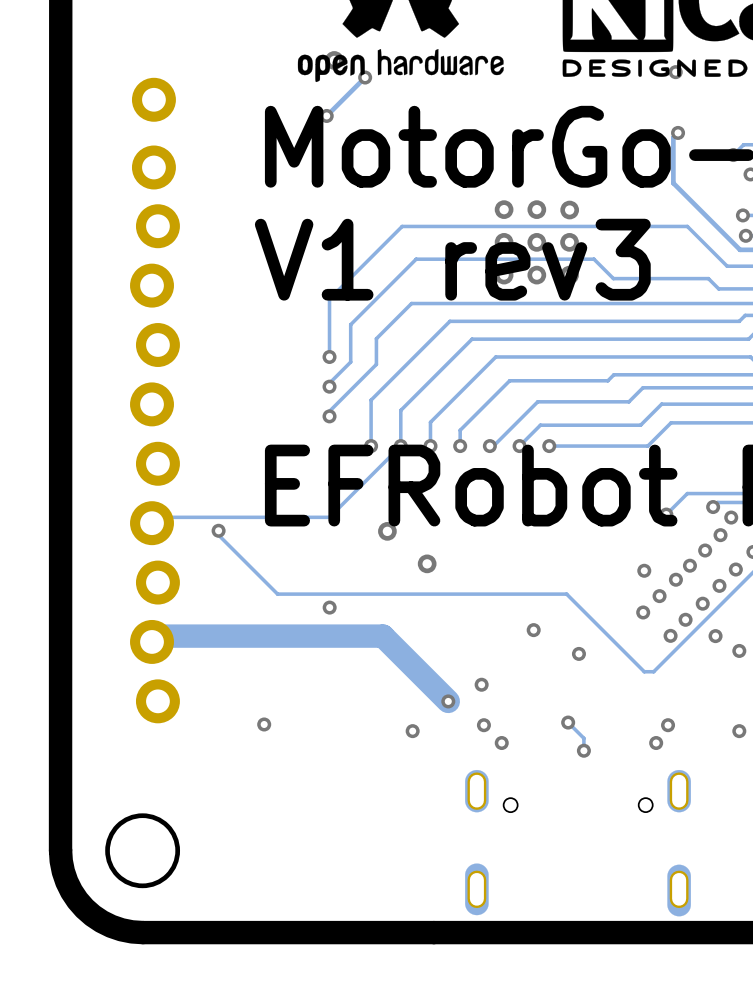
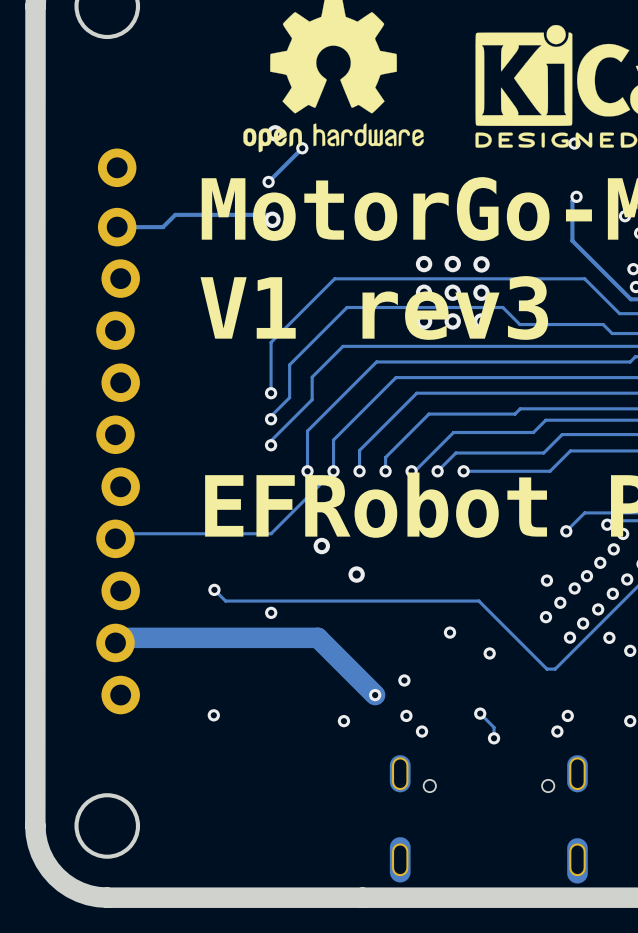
track: none -> (272, 219) (267, 214) (175, 214) (163, 227) (117, 227)
via: none -> (272, 219)
track: (218, 530) (218, 535) (264, 581) -> none
via position: (218, 530) -> (214, 589)

